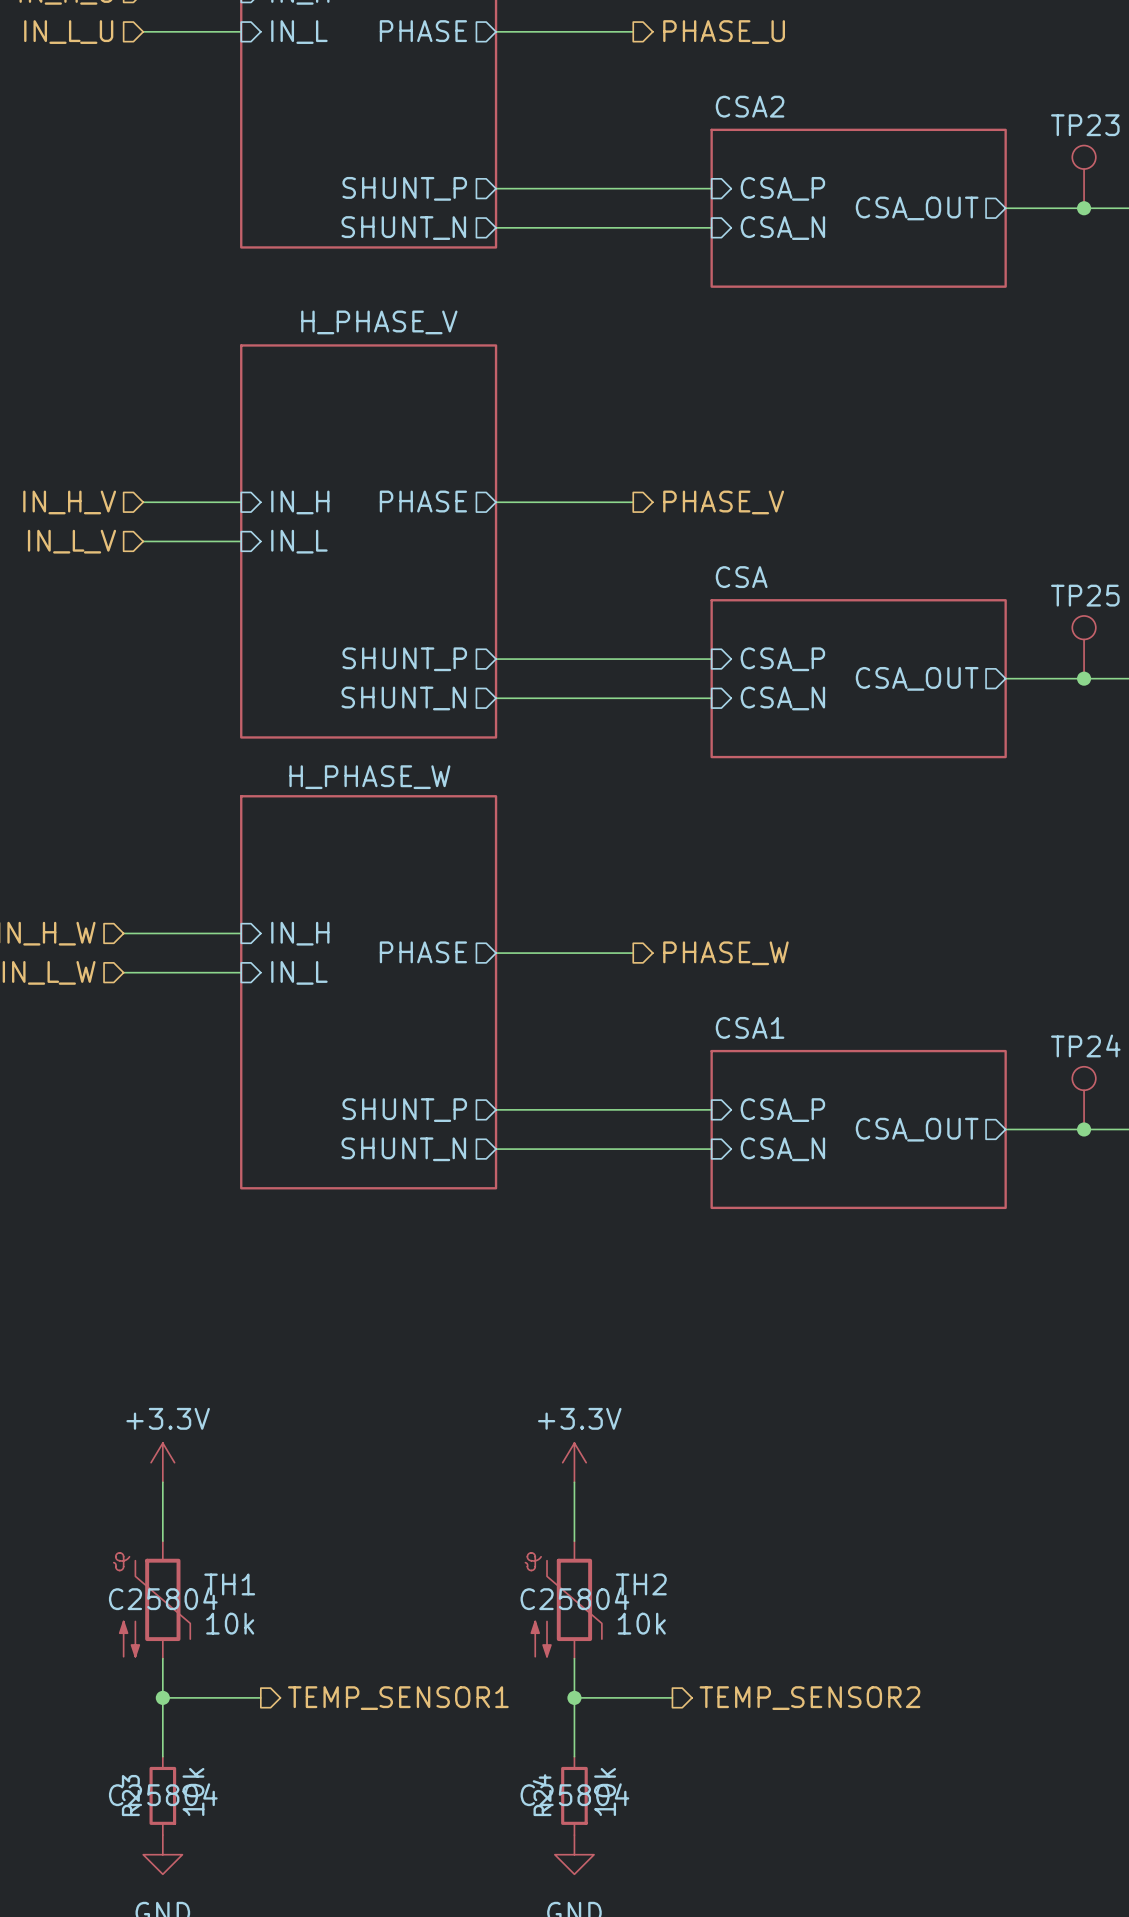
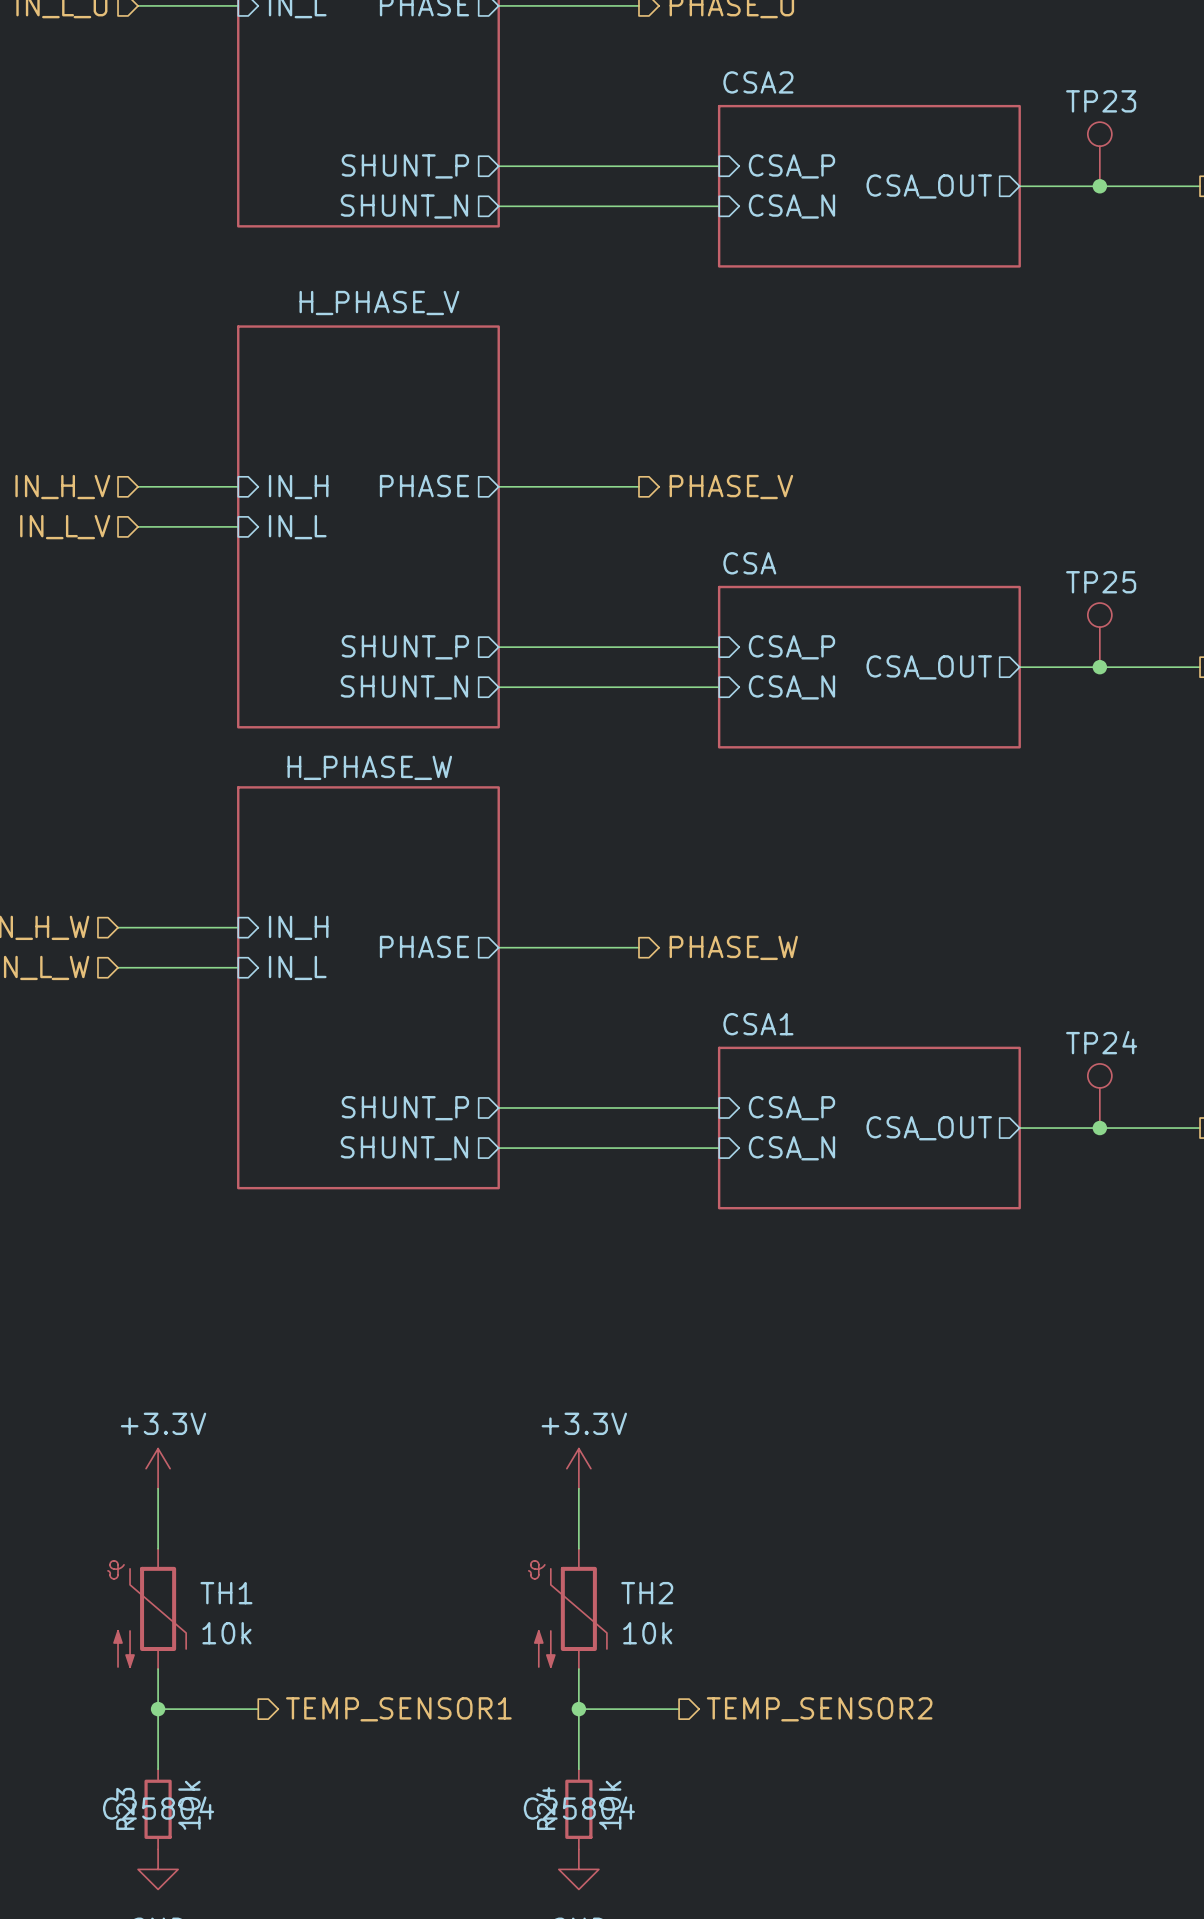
TH1 text: C25804 (163, 1598) -> none
TH2 text: C25804 (574, 1598) -> none

